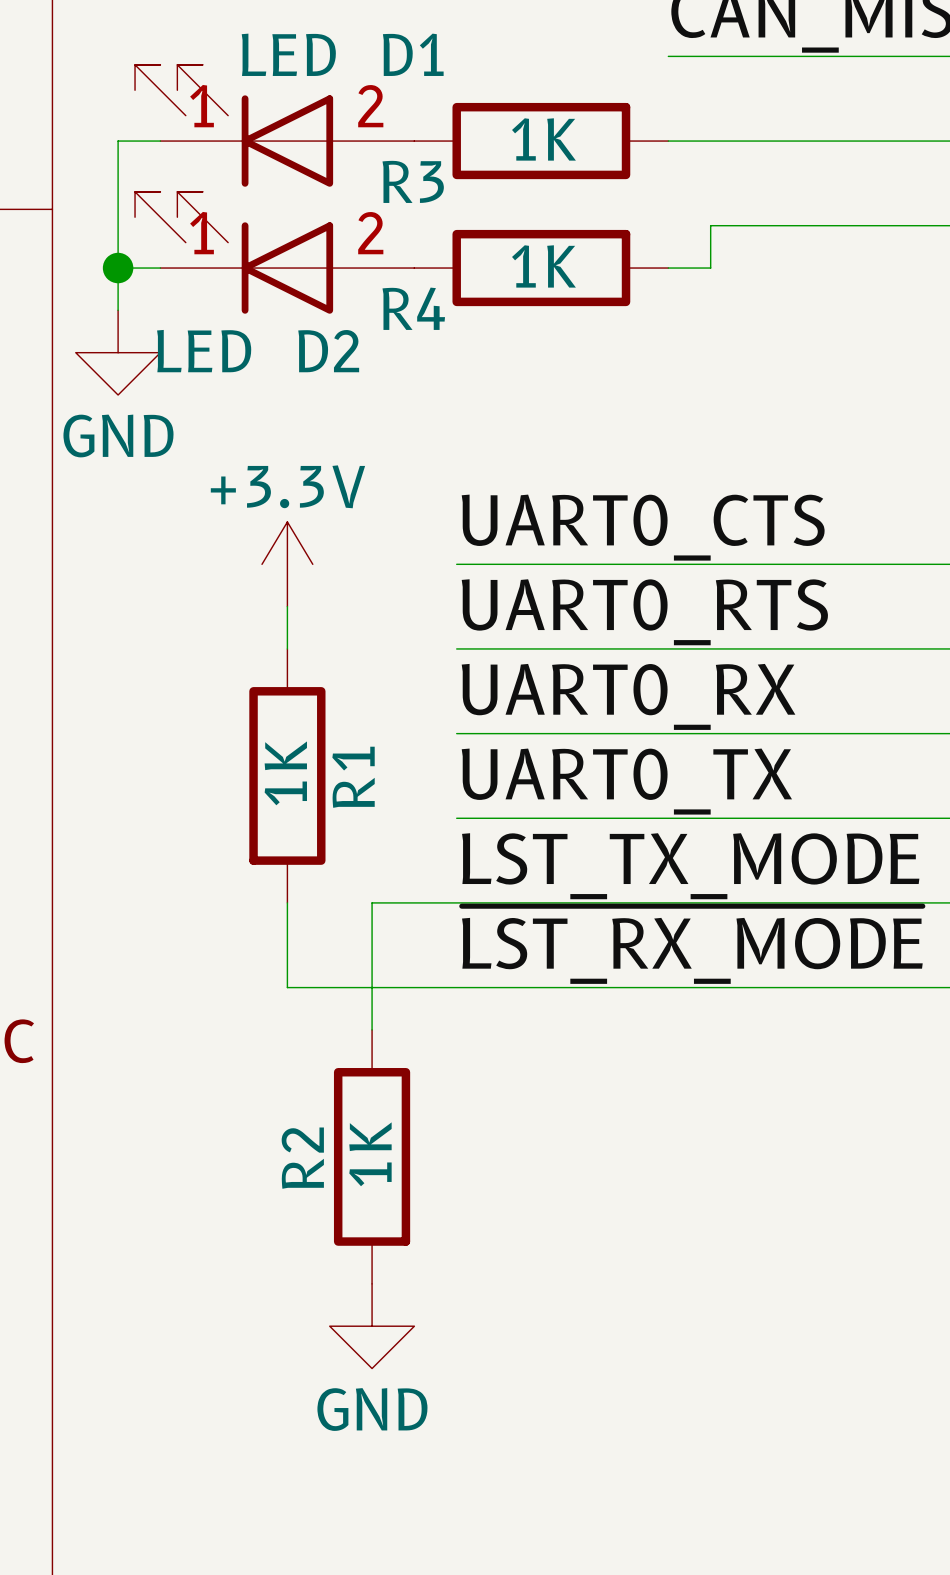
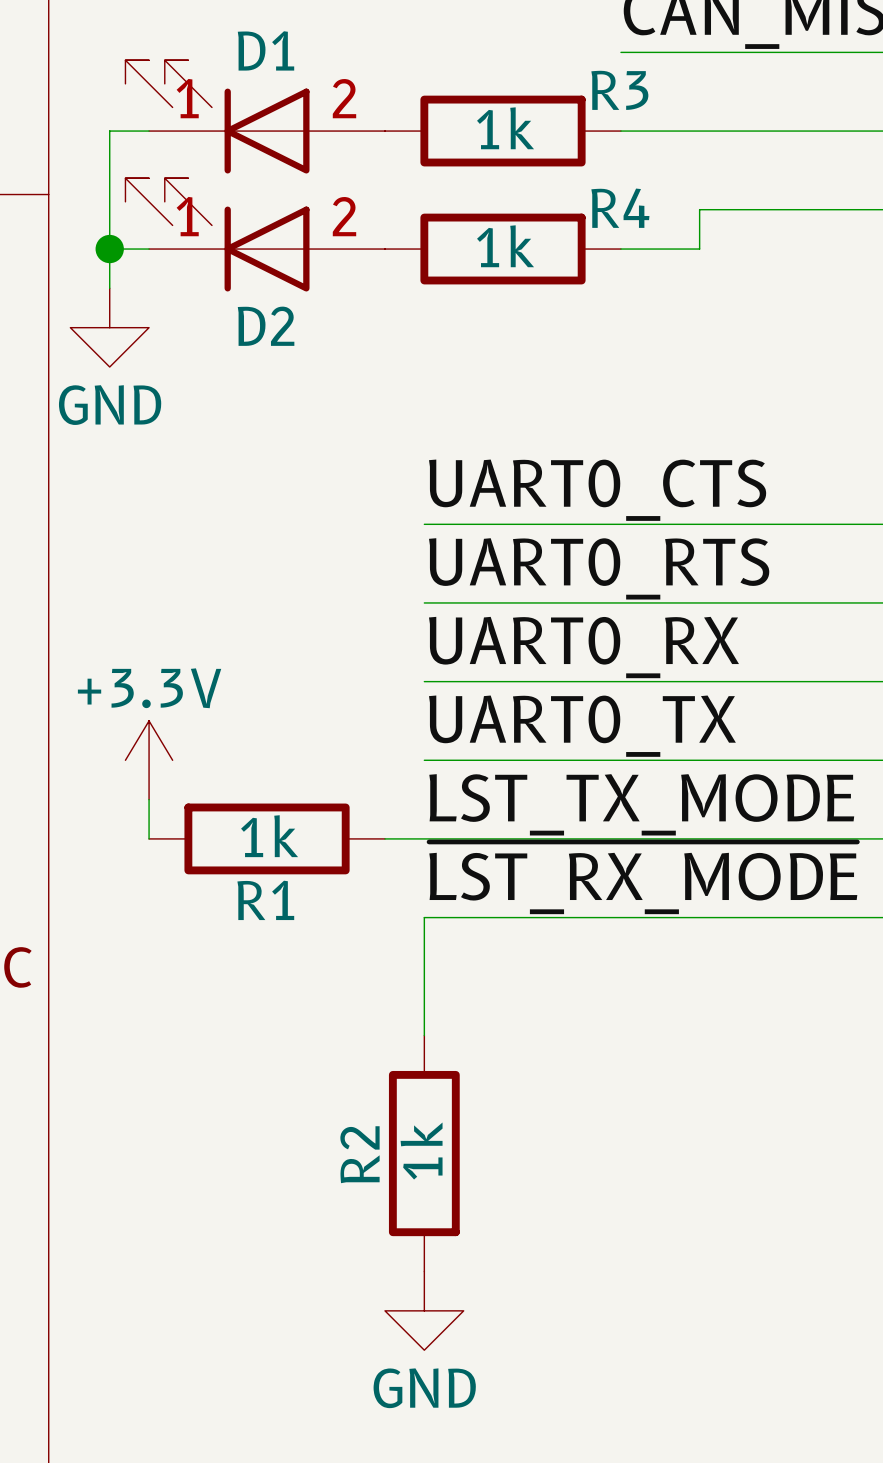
D1 value: LED (288, 54) -> none
D1 name position: D1 (413, 54) -> D1 (265, 50)
R3 value: 1K (543, 139) -> 1k (505, 128)
R3 name position: R3 (413, 181) -> R3 (619, 90)
wire: (753, 225) (710, 225) (710, 268) -> (699, 209) (699, 249) (660, 249)
R4 value: 1K (543, 266) -> 1k (505, 246)
R4 name position: R4 (413, 308) -> R4 (620, 208)
D2 value: LED (204, 351) -> none
D2 name position: D2 (328, 351) -> D2 (266, 326)
power symbol position: +3.3V (287, 564) -> +3.3V (149, 760)
wire: (287, 606) (287, 648) -> (149, 799) (149, 838)
R1 value: 1K (285, 773) -> 1k (269, 836)
R1 rotation: 0° (287, 775) -> 90° clockwise (267, 838)
wire: (287, 902) (287, 987) (456, 987) -> (424, 1035) (424, 917)
wire: (414, 902) (372, 902) (372, 1029) -> none
R2 value: 1K (370, 1154) -> 1k (421, 1151)
R2 position: (372, 1156) -> (424, 1153)
power symbol position: GND (372, 1326) -> GND (424, 1310)

